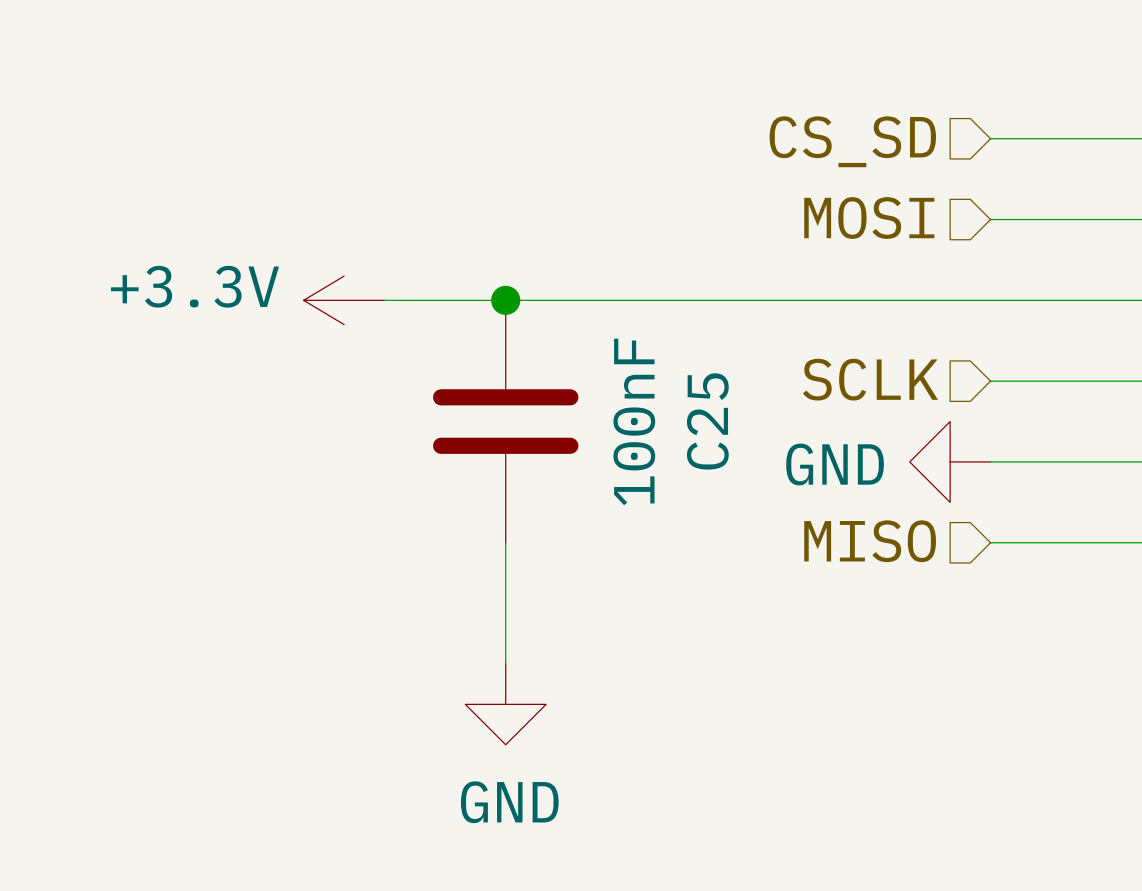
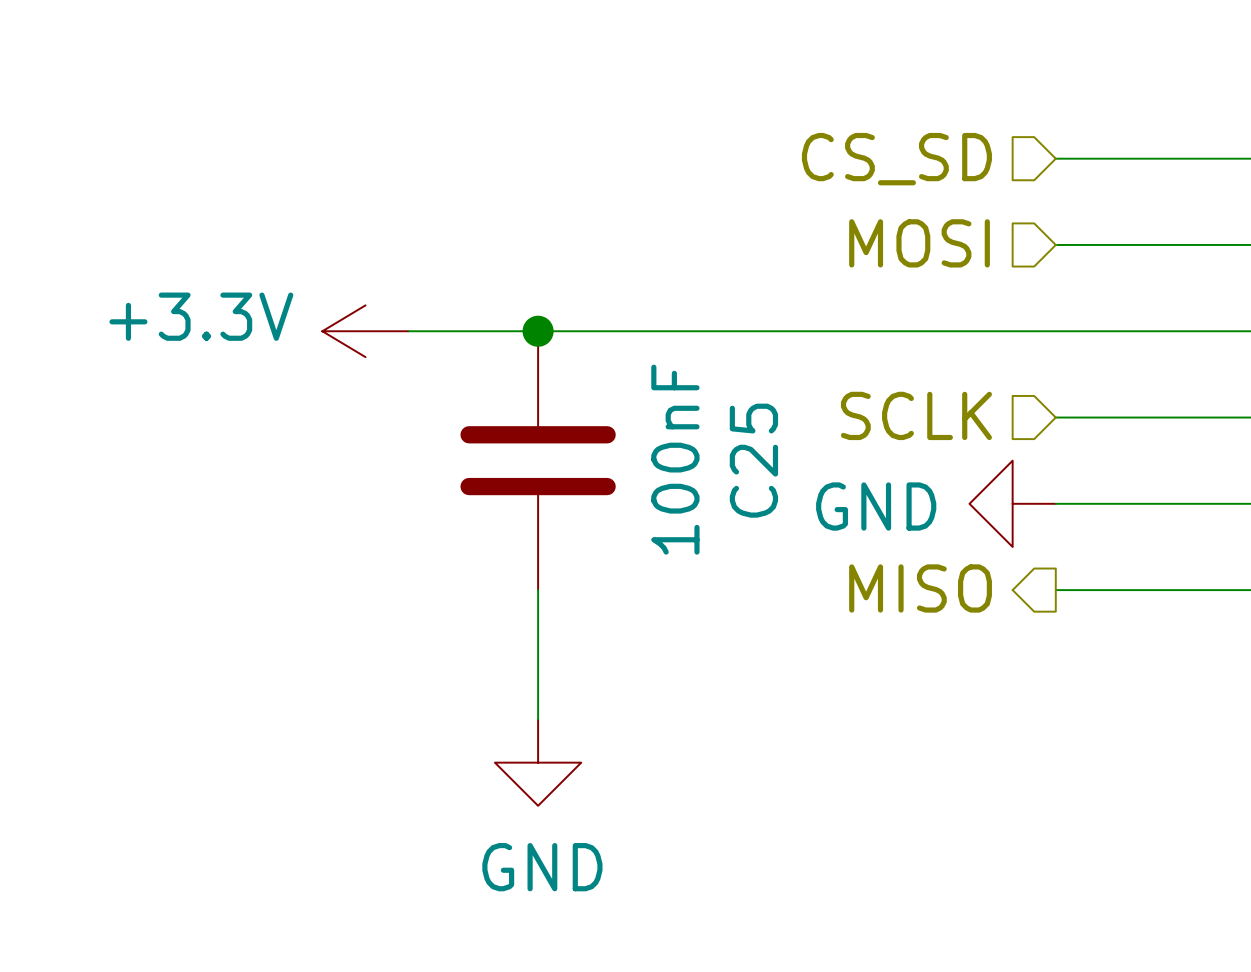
hierarchical label shape: input (870, 541) -> output (920, 588)

